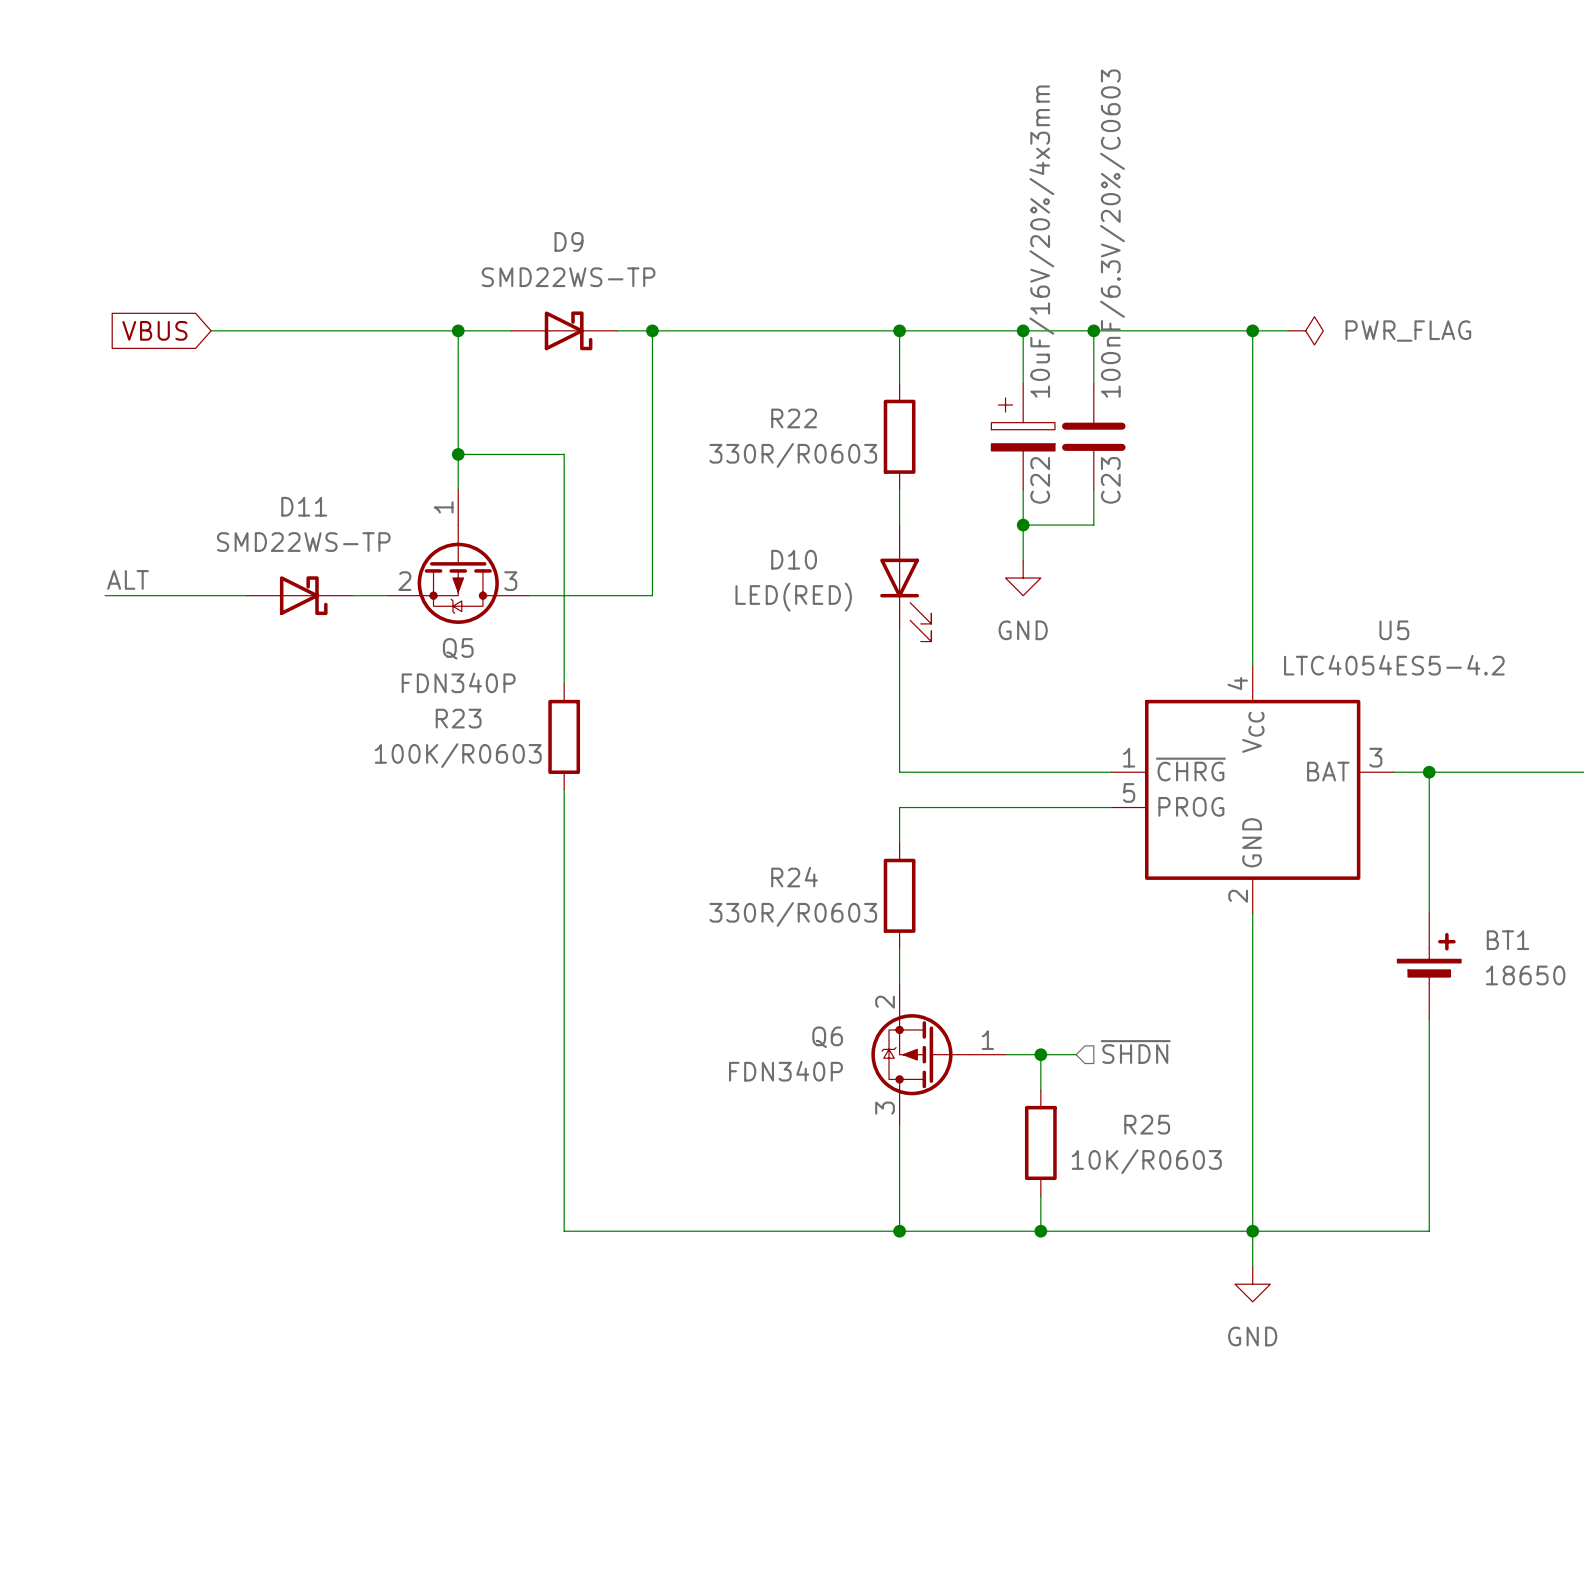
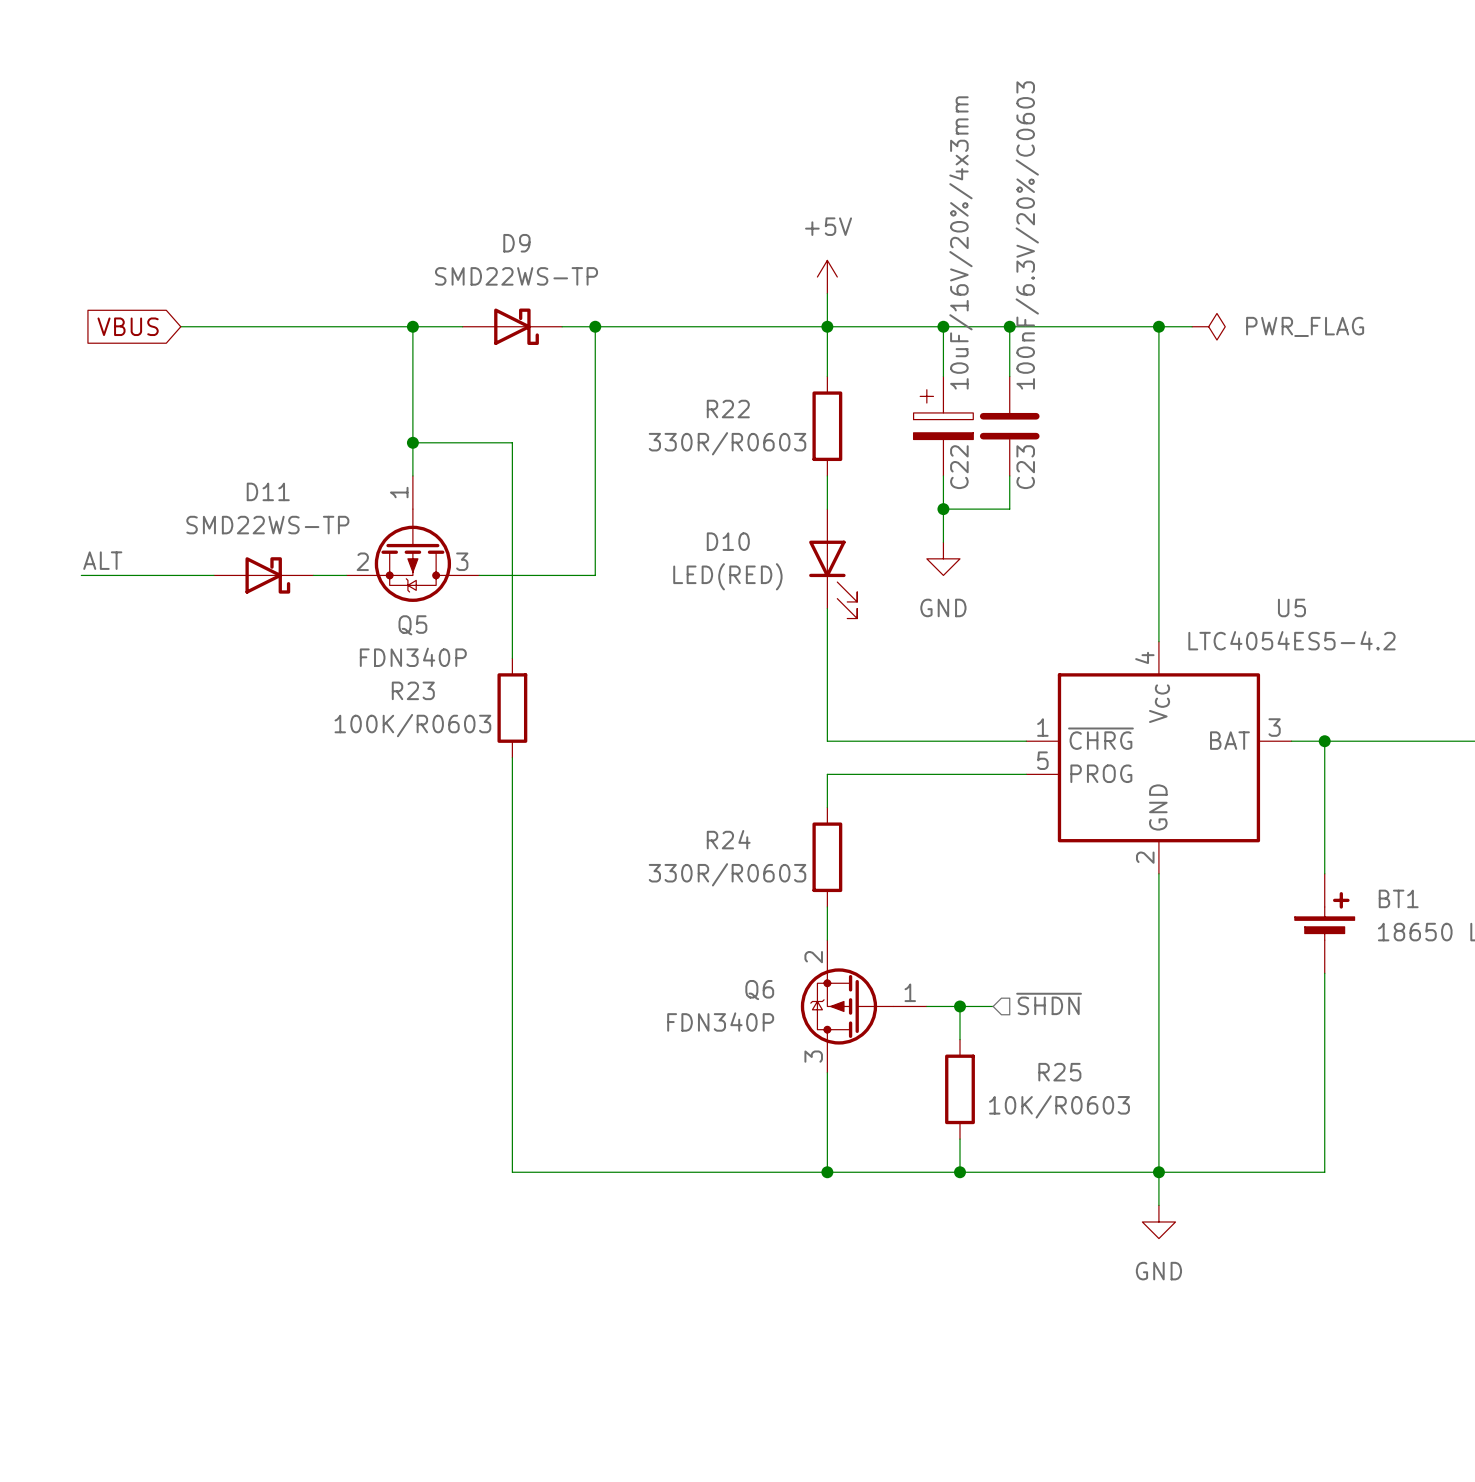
power symbol: none -> +5V (827, 277)
wire: none -> (827, 293) (827, 326)

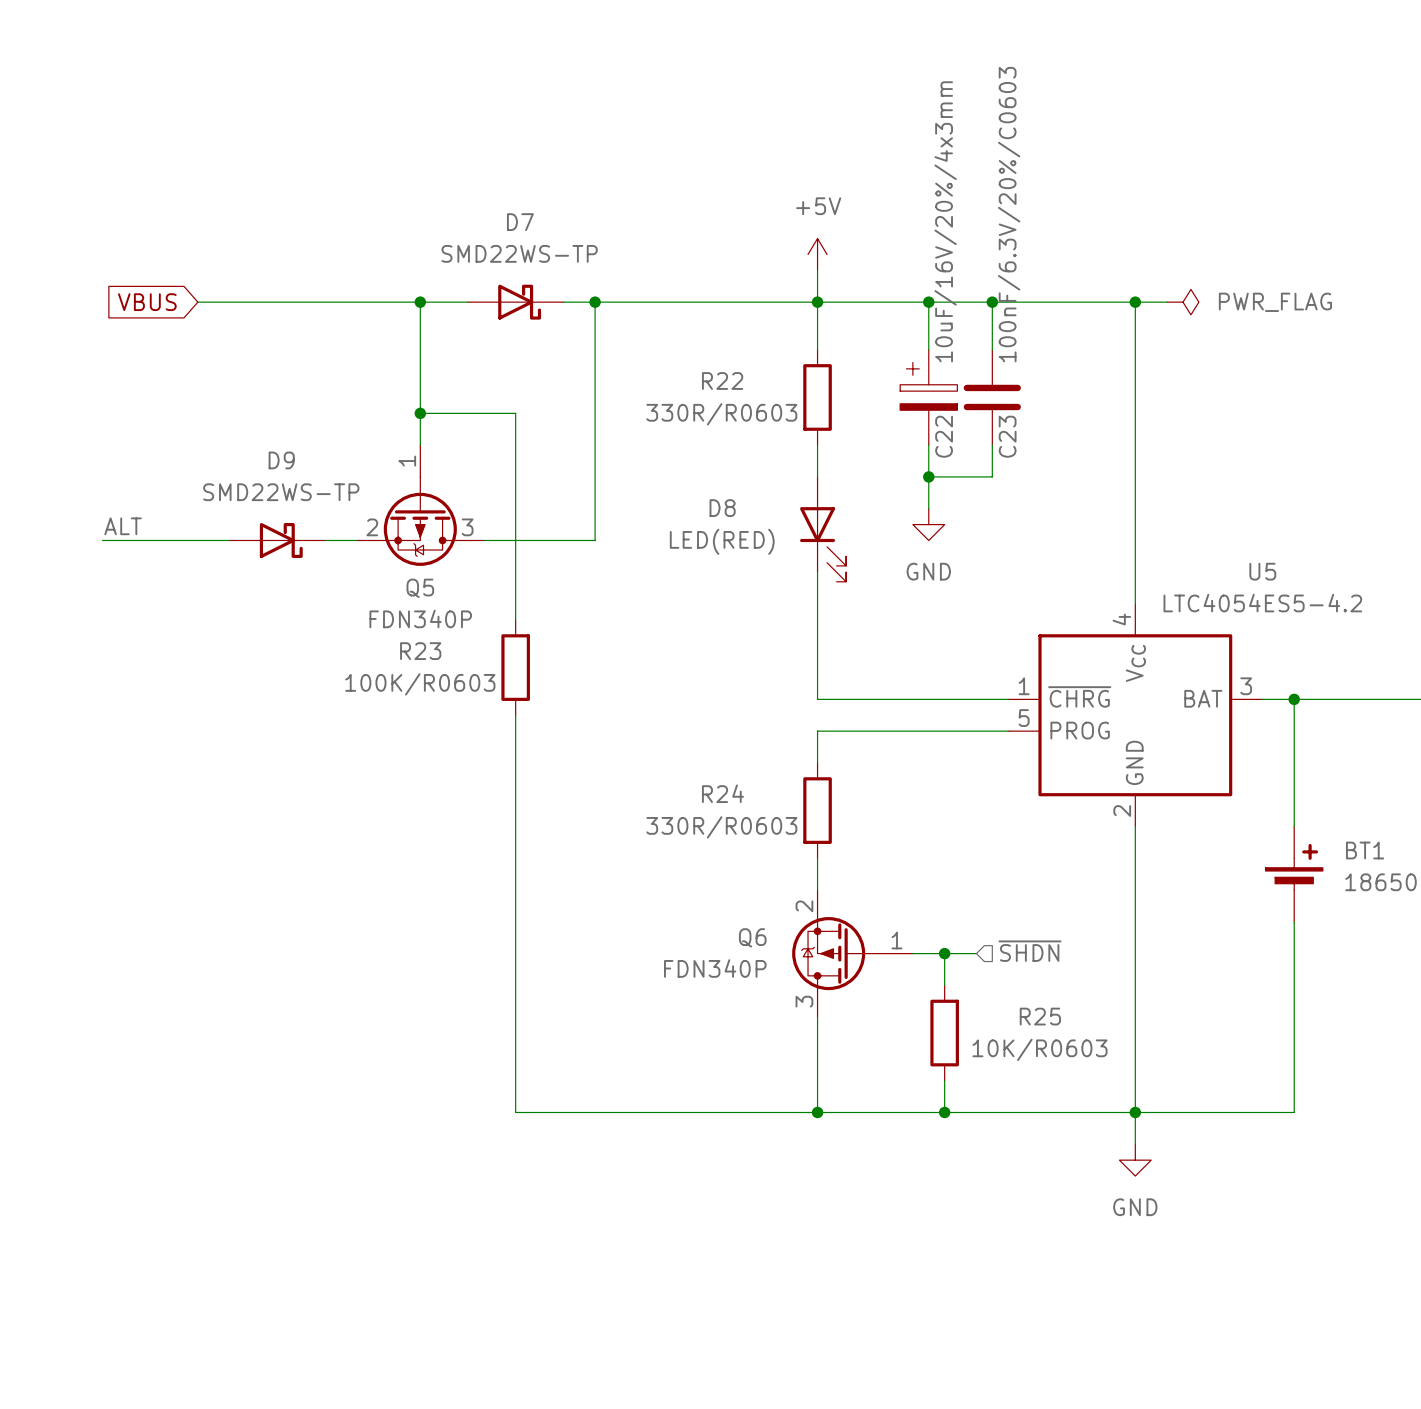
D9 name: D9 (516, 243) -> D7 (520, 222)
D11 name: D11 (268, 491) -> D9 (281, 460)
D10 name: D10 (728, 541) -> D8 (722, 508)

